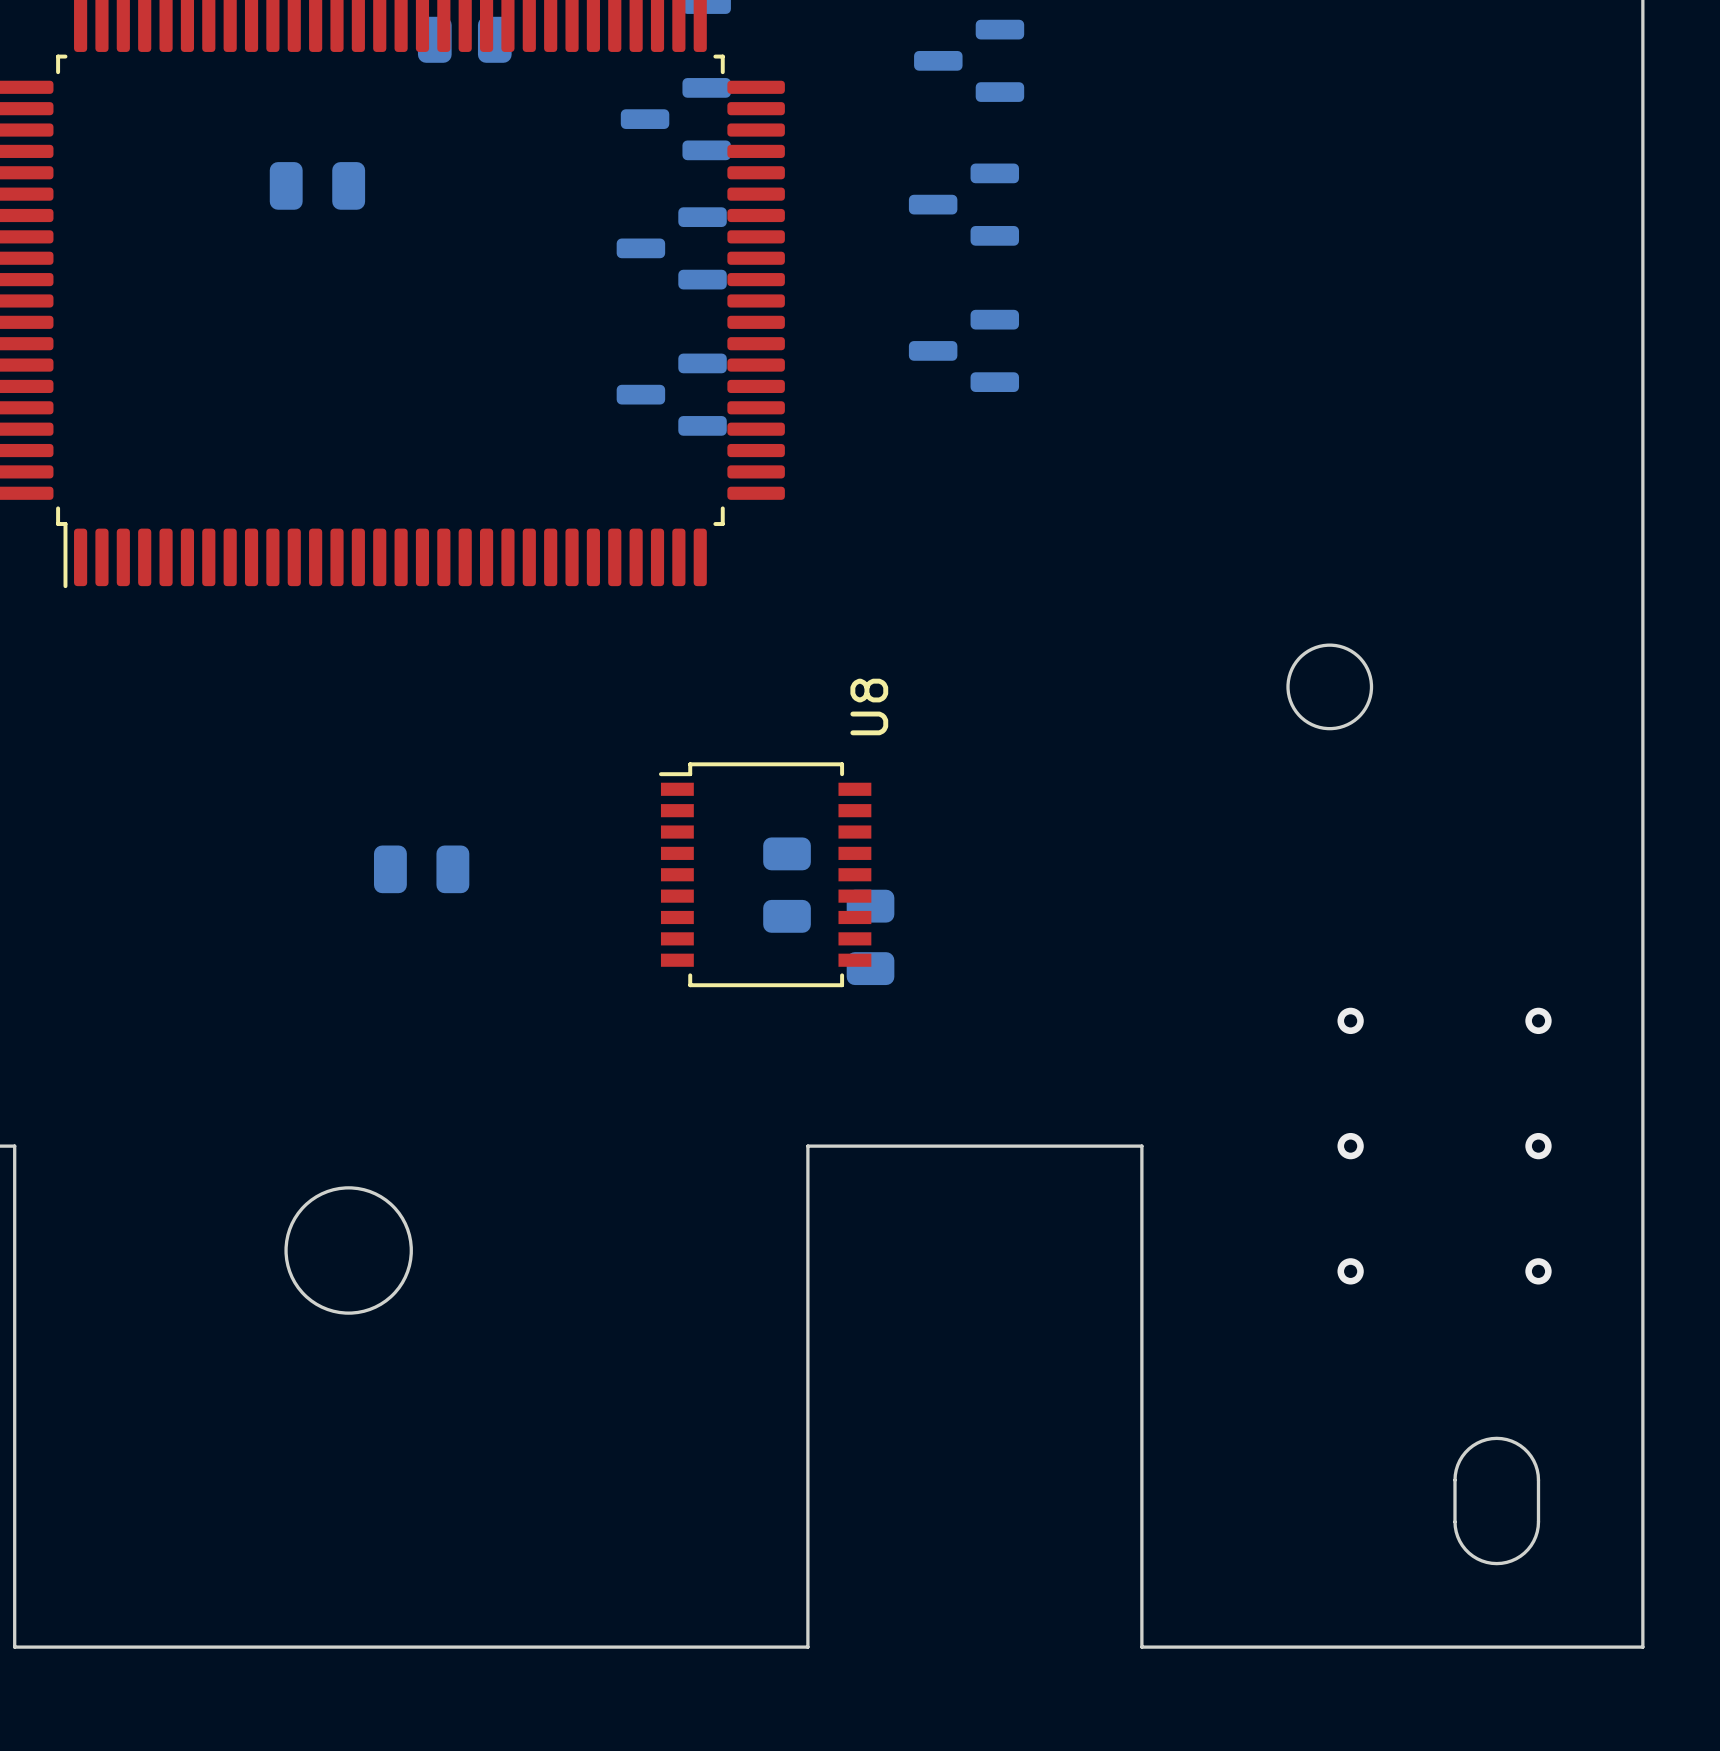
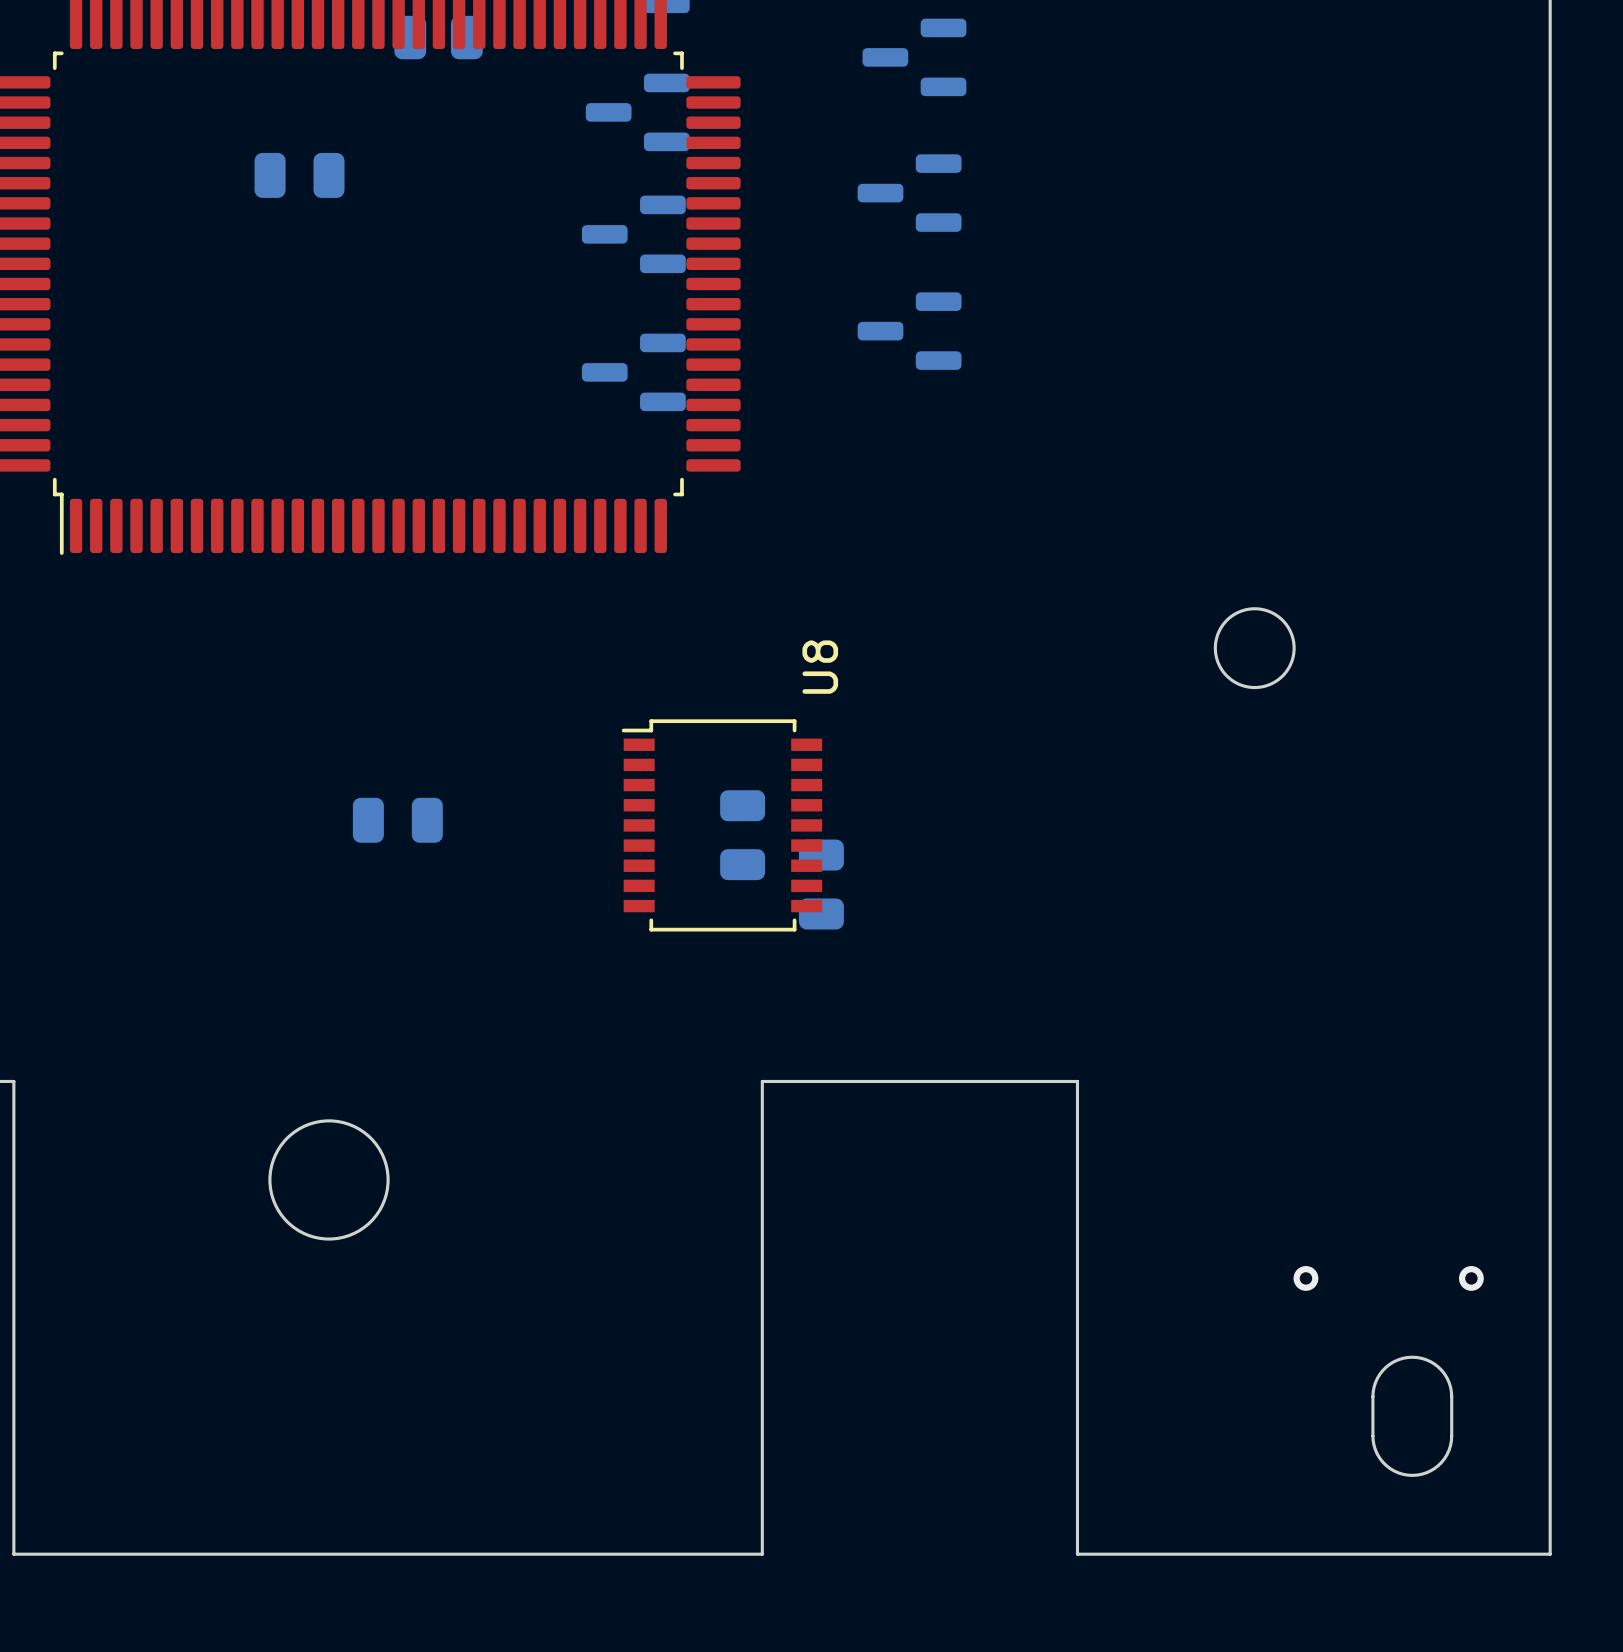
via: (1350, 1020) -> none
via: (1538, 1020) -> none
via: (1350, 1146) -> none
via: (1538, 1146) -> none
via: (1350, 1271) -> none
via position: (1538, 1271) -> (1471, 1278)
via: none -> (1305, 1278)

